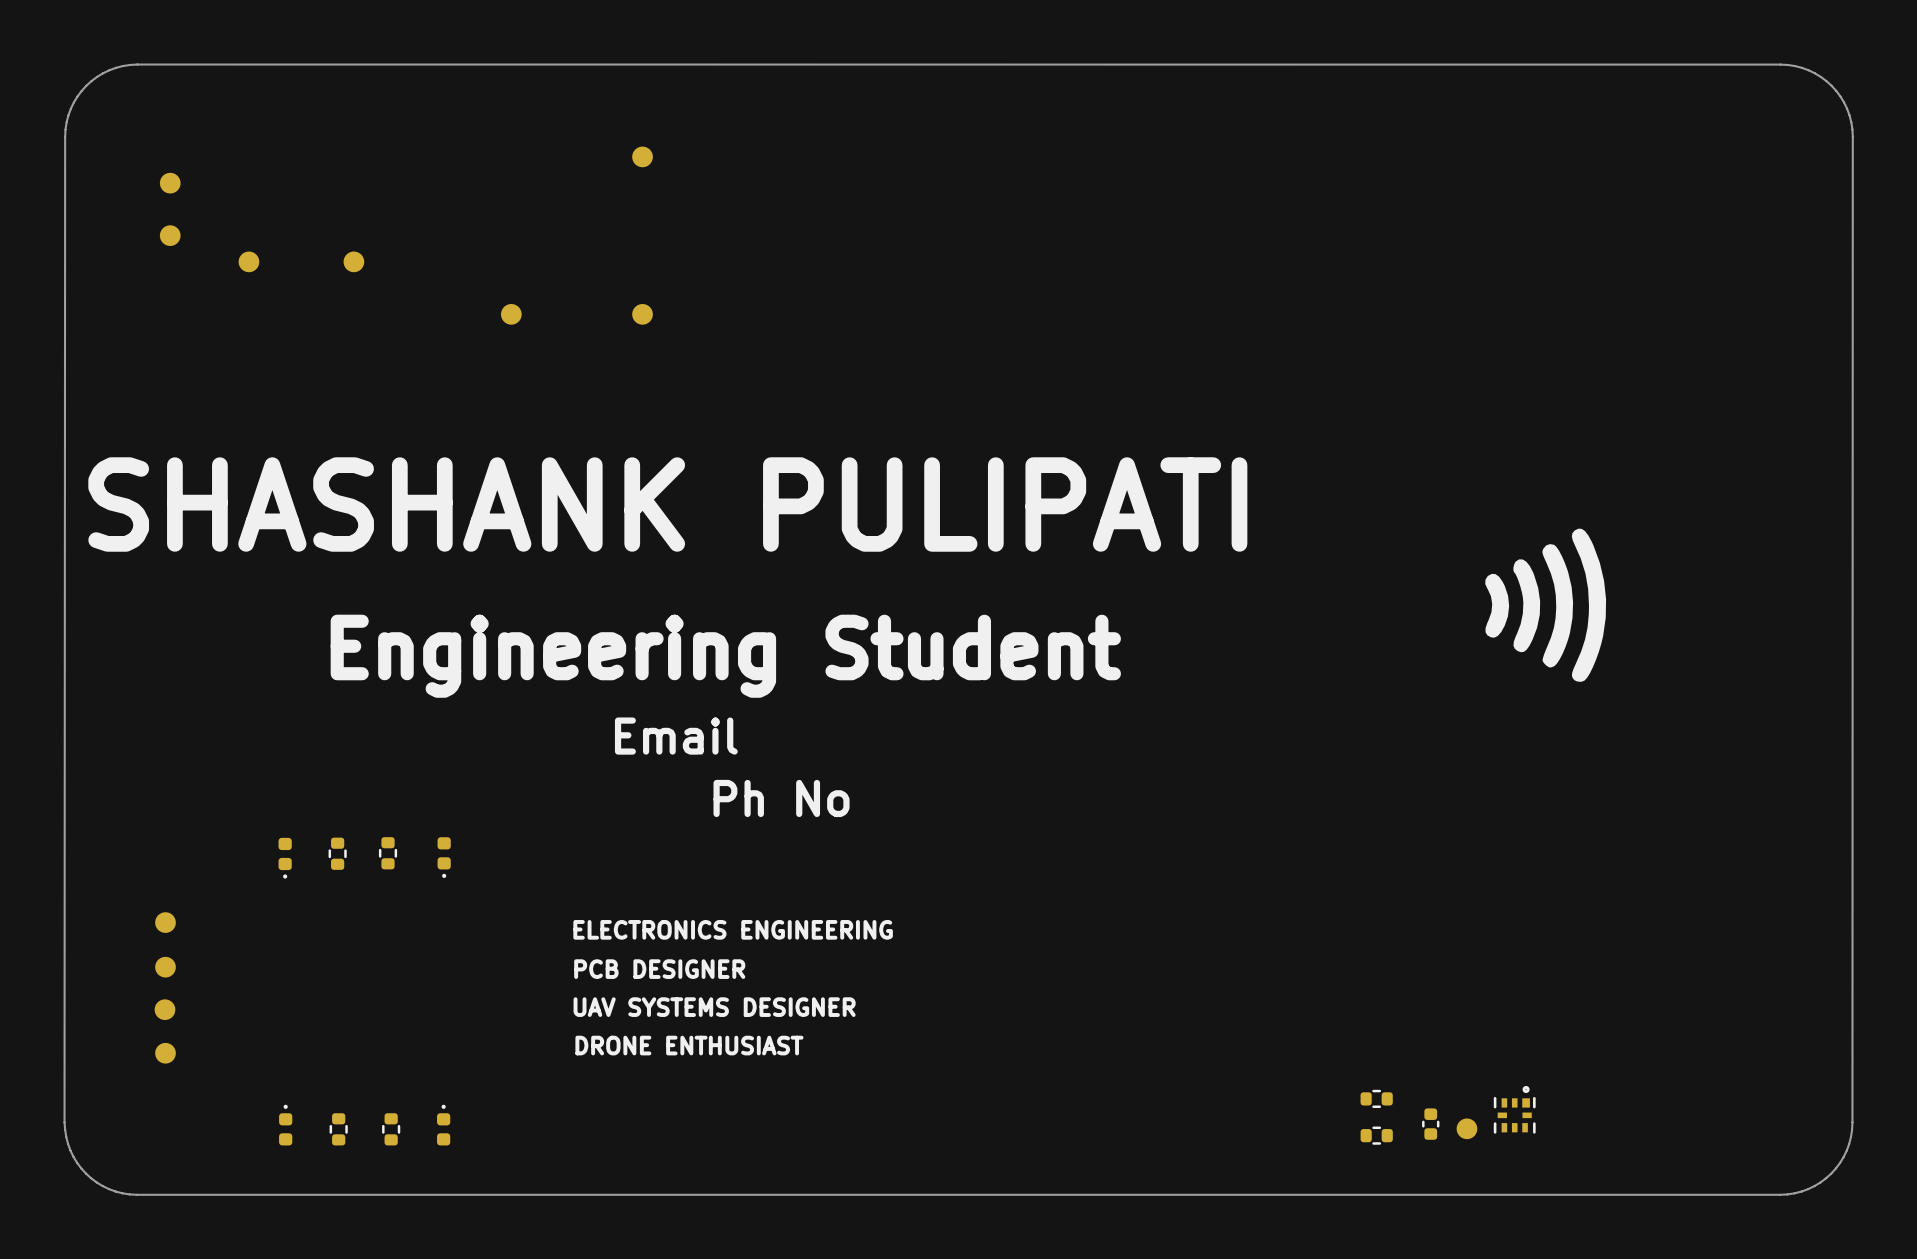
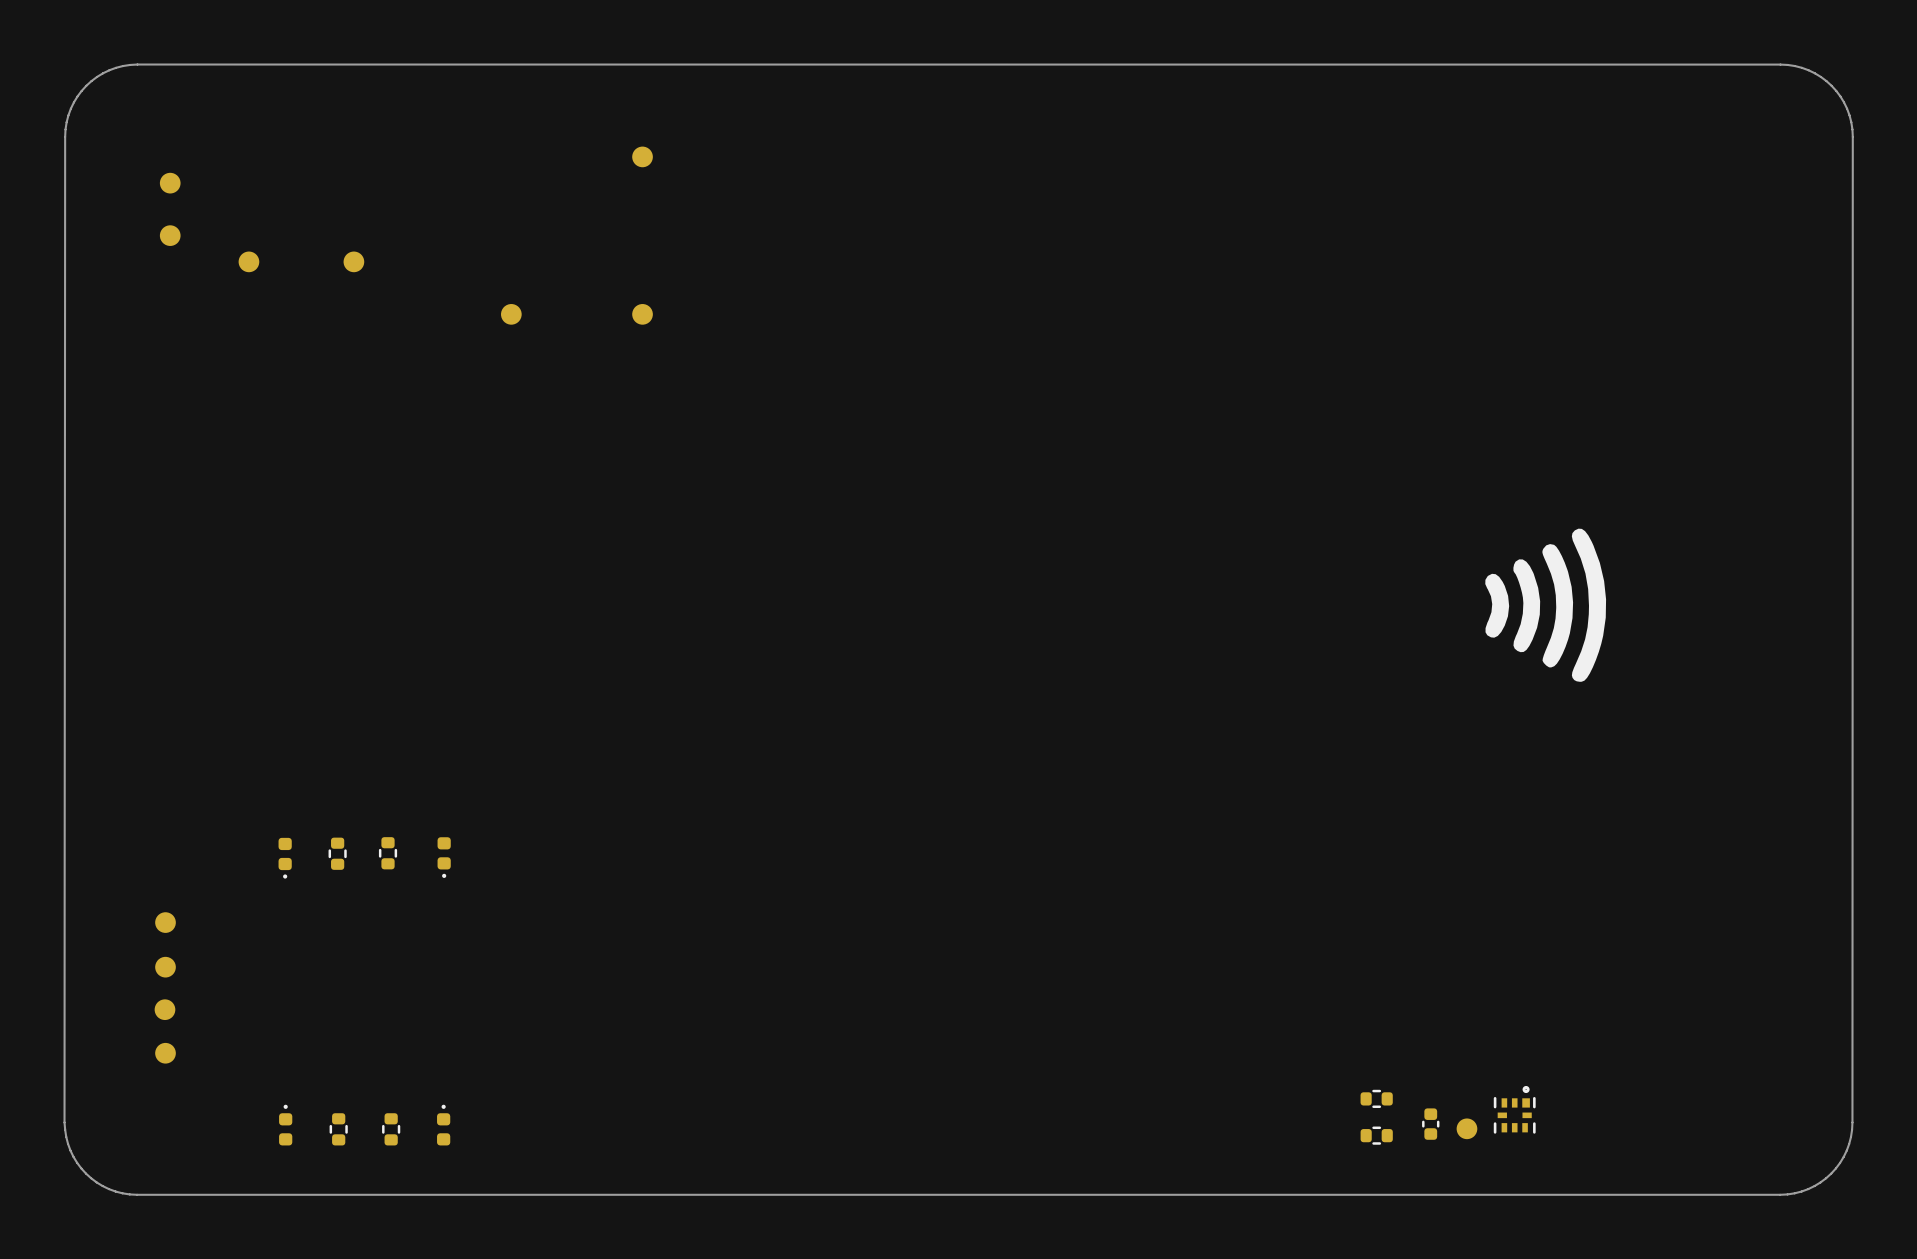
text: SHASHANK PULIPATI (667, 504) -> none
text: Engineering Student (725, 656) -> none
text: Email (676, 736) -> none
text: Ph No (781, 798) -> none
text: ELECTRONICS ENGINEERING (733, 929) -> none
text: PCB DESIGNER (659, 969) -> none
text: UAV SYSTEMS DESIGNER (714, 1007) -> none
text: DRONE ENTHUSIAST (689, 1045) -> none

